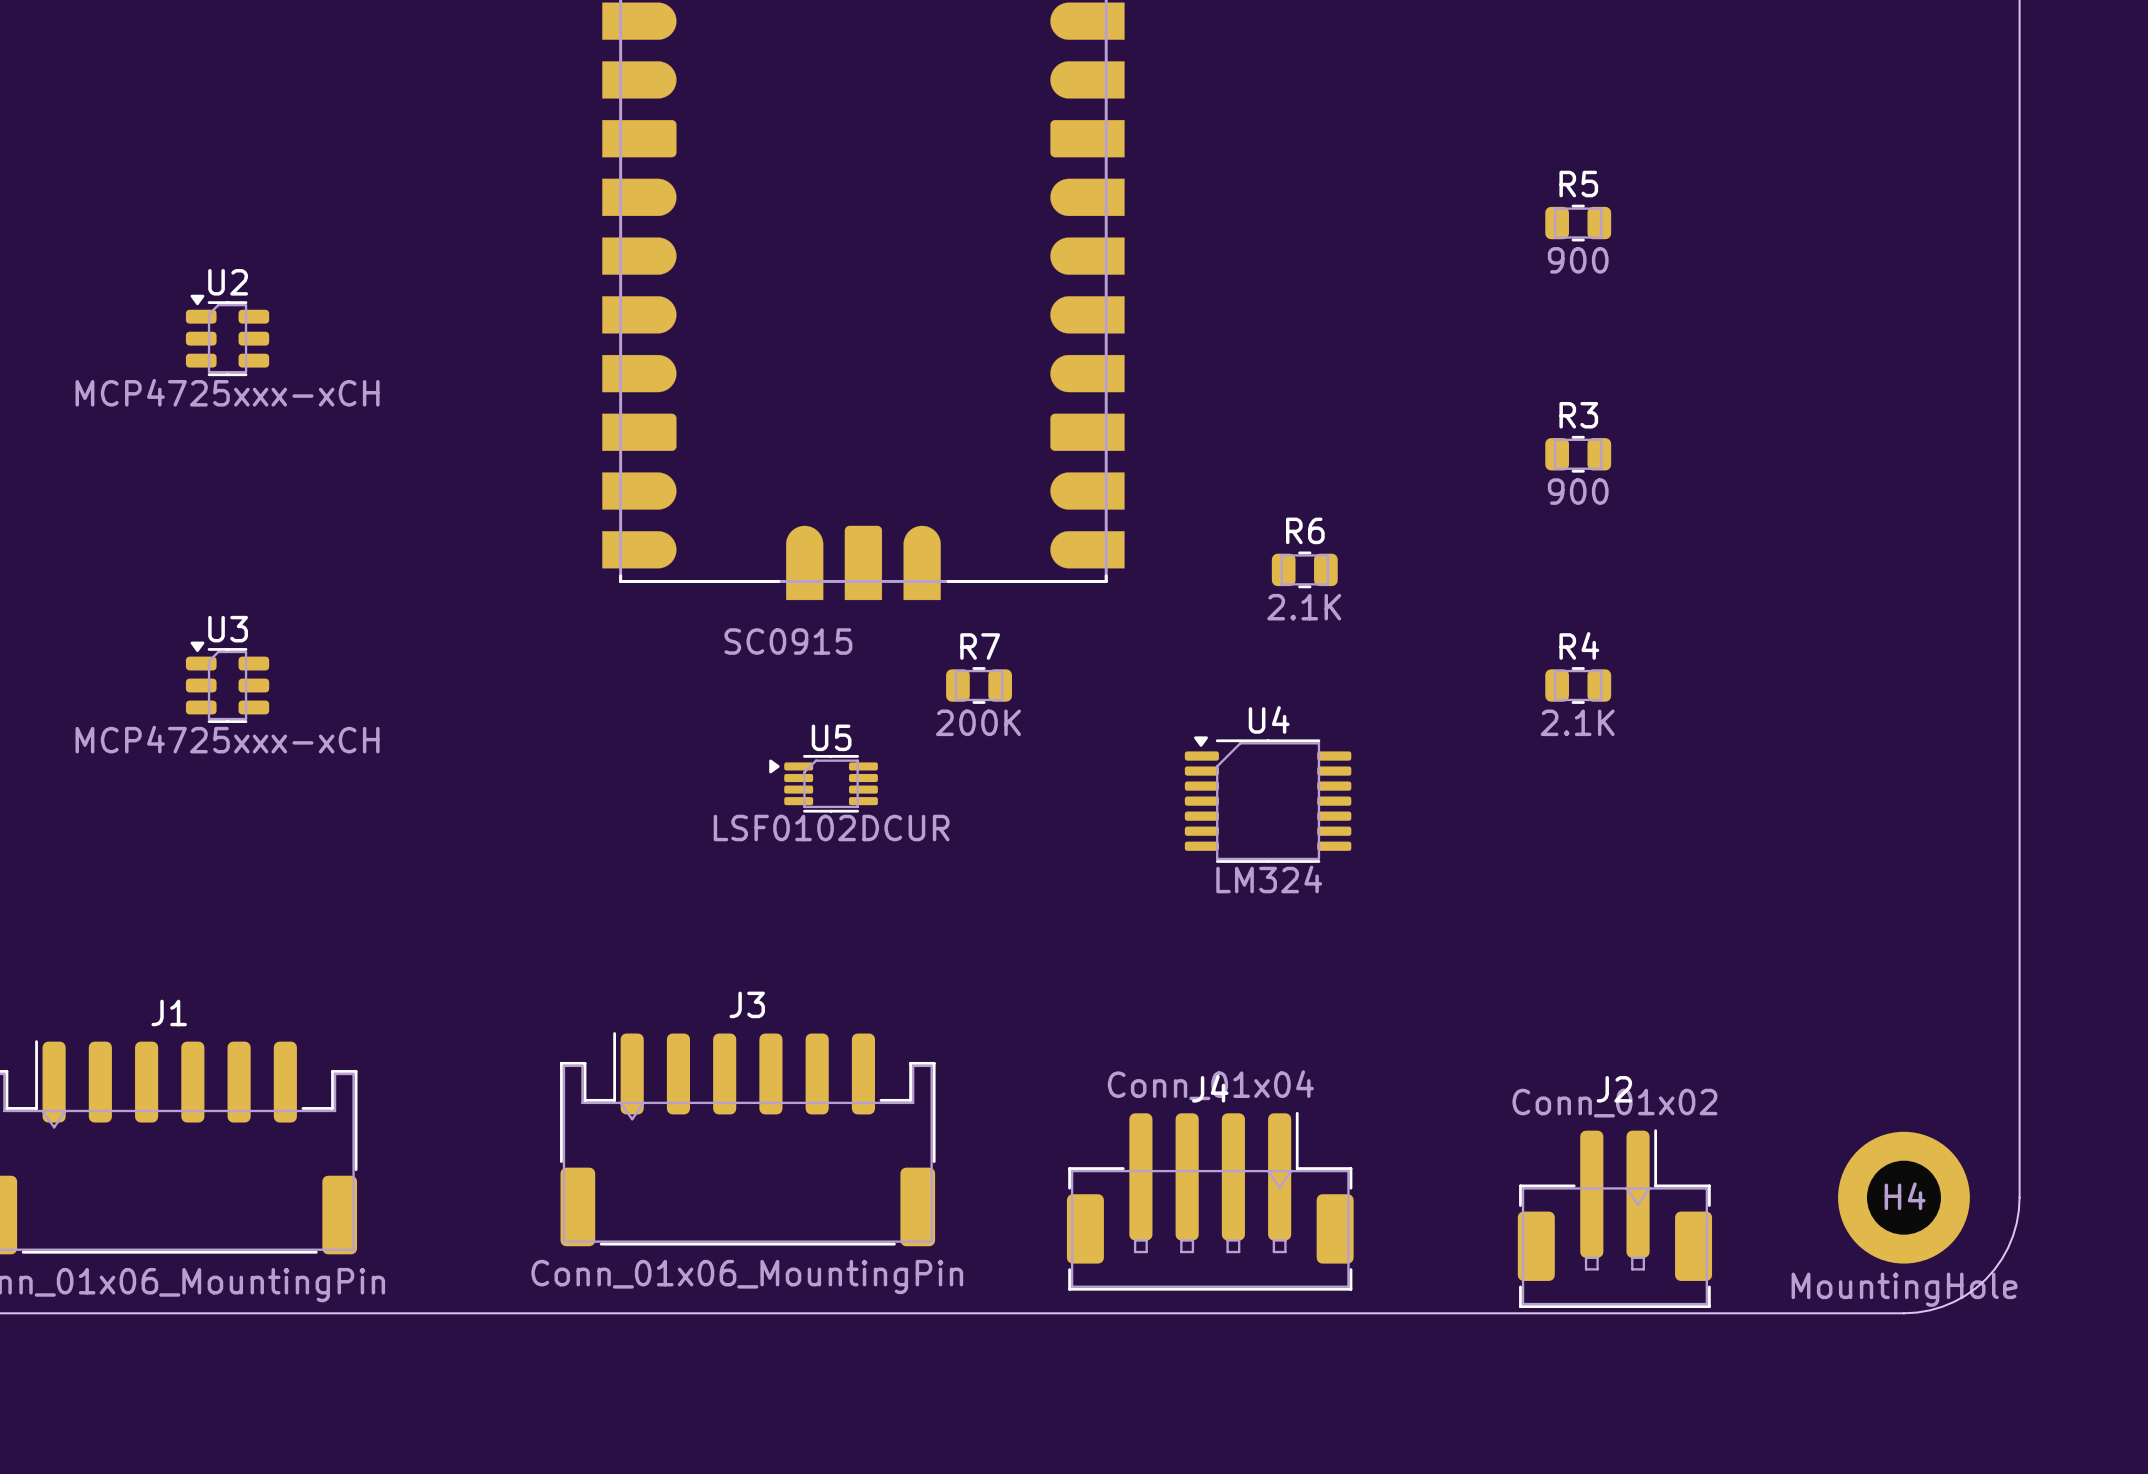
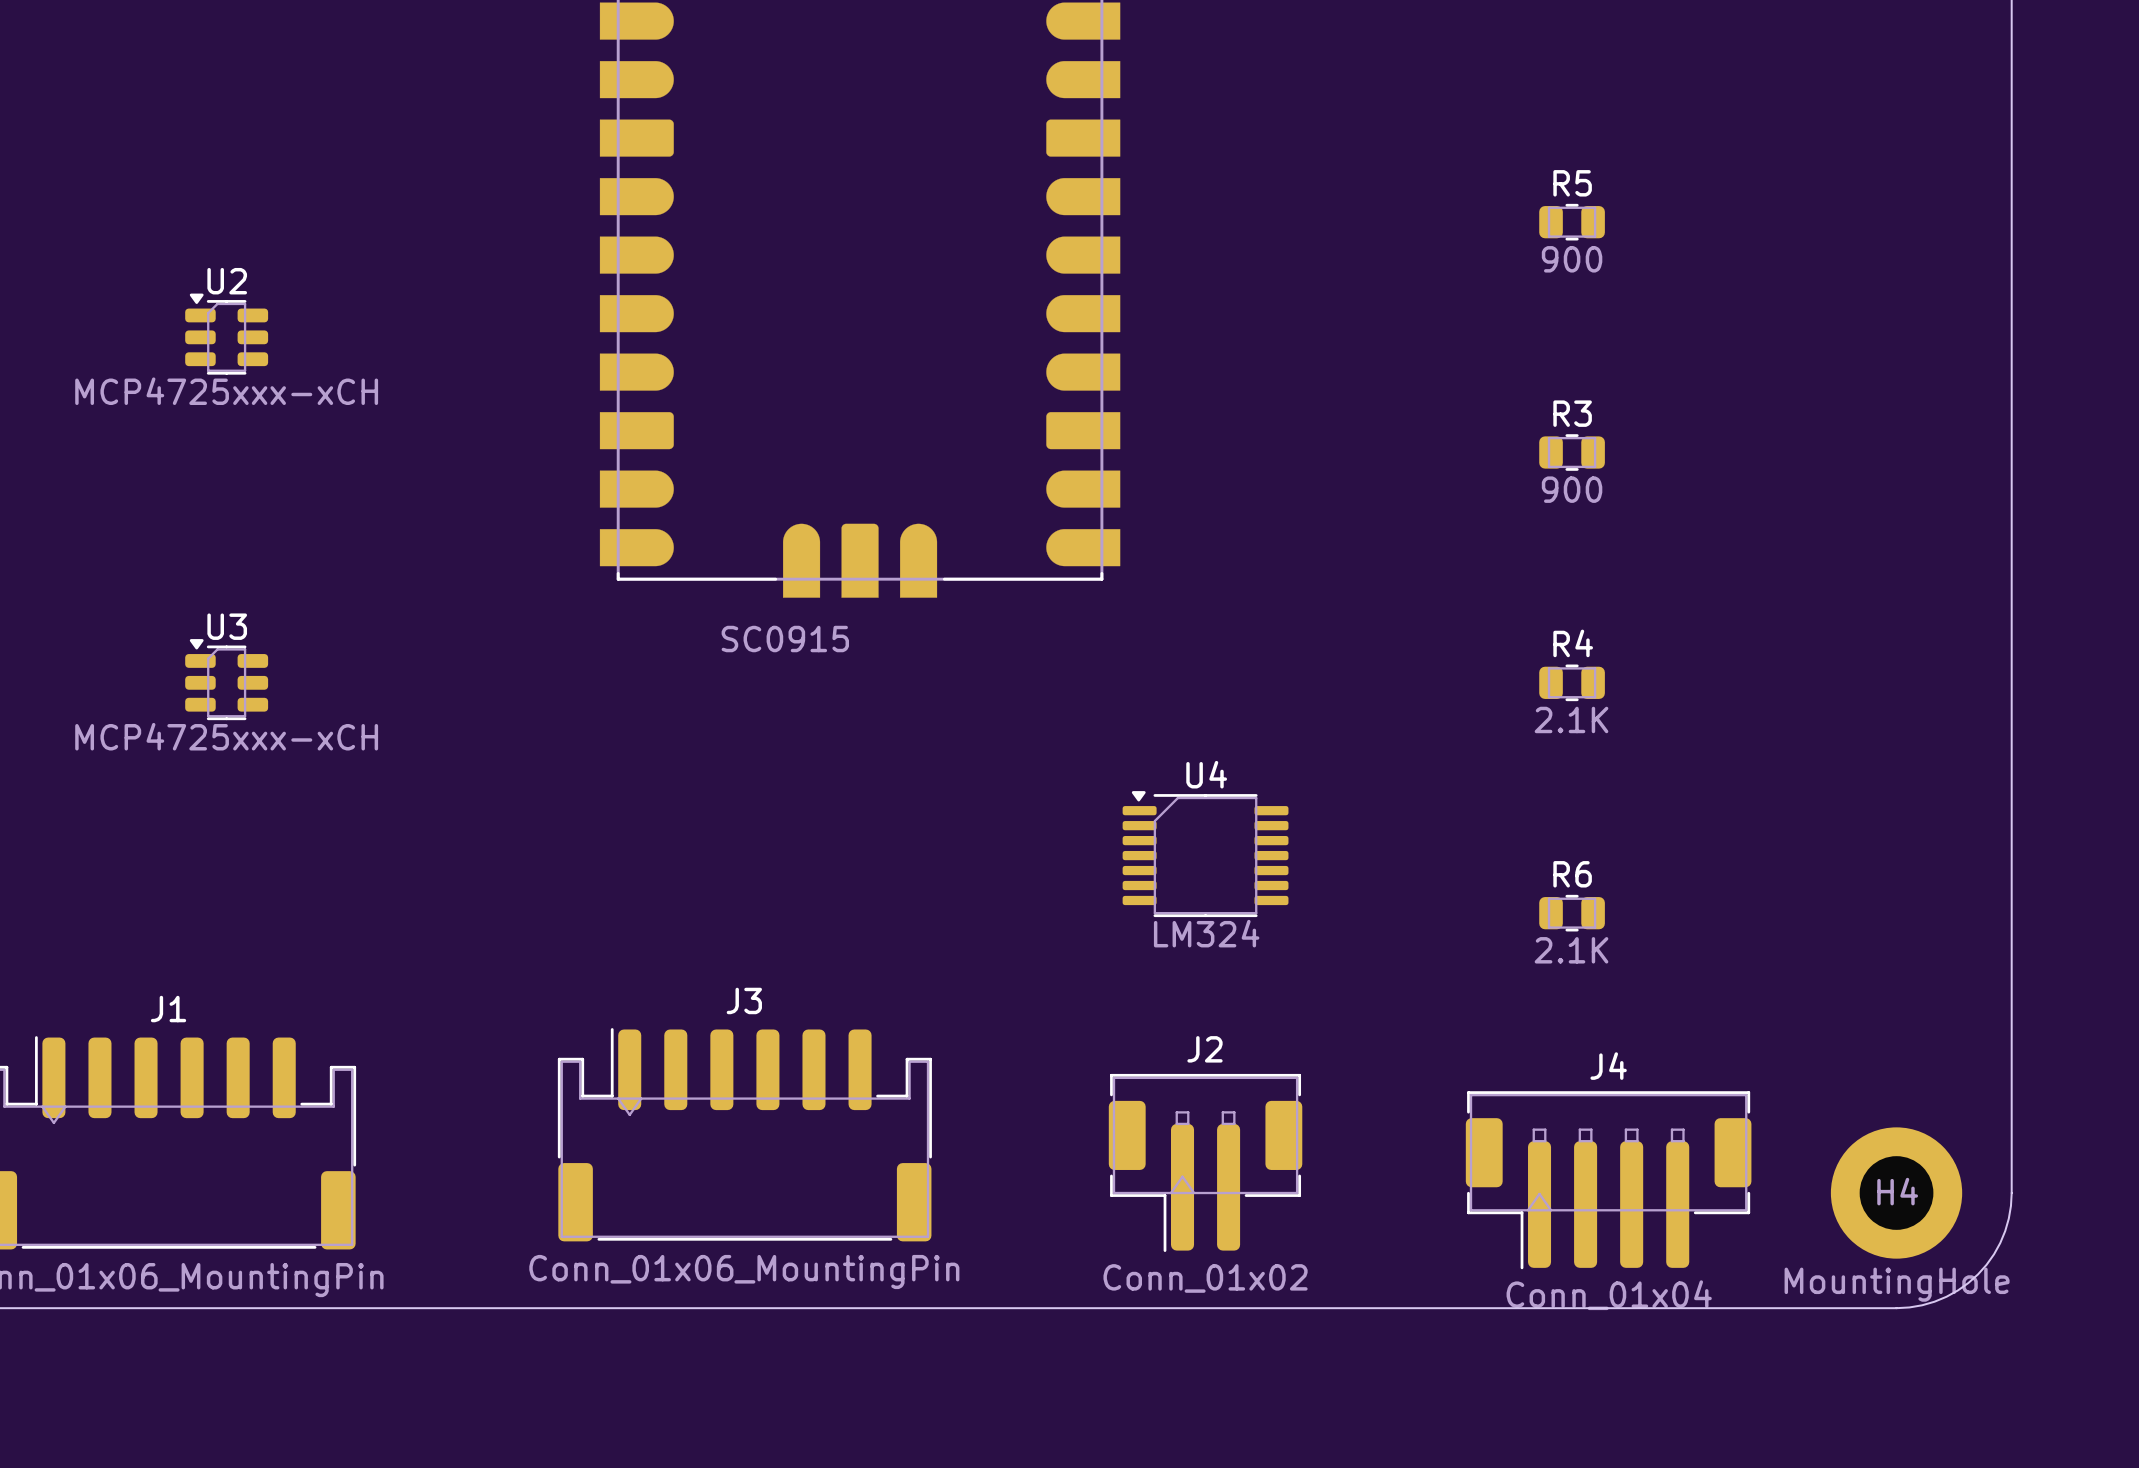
R6 position: (1304, 569) -> (1572, 913)
R7: 200K (979, 685) -> none
U5: LSF0102DCUR (823, 783) -> none
U4 position: (1268, 799) -> (1205, 854)
J4 rotation: 0° (1210, 1201) -> 180° (1608, 1180)
J4 position: (1210, 1201) -> (1608, 1180)
J2 rotation: 0° (1614, 1218) -> 180° (1205, 1162)
J2 position: (1614, 1218) -> (1205, 1162)

